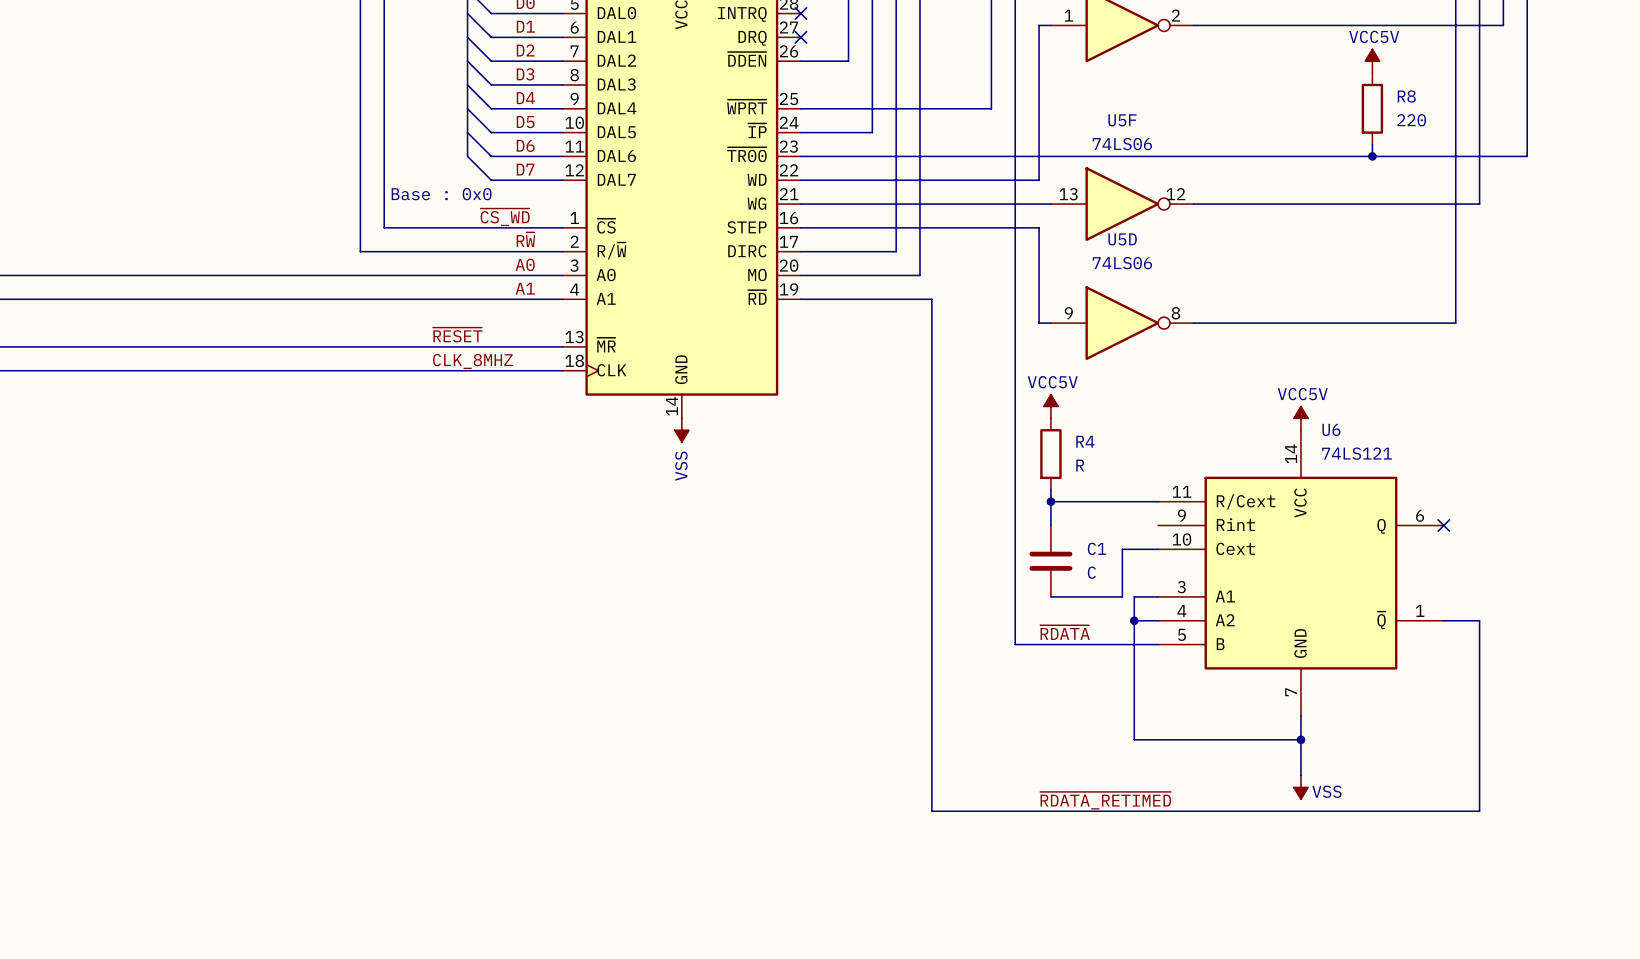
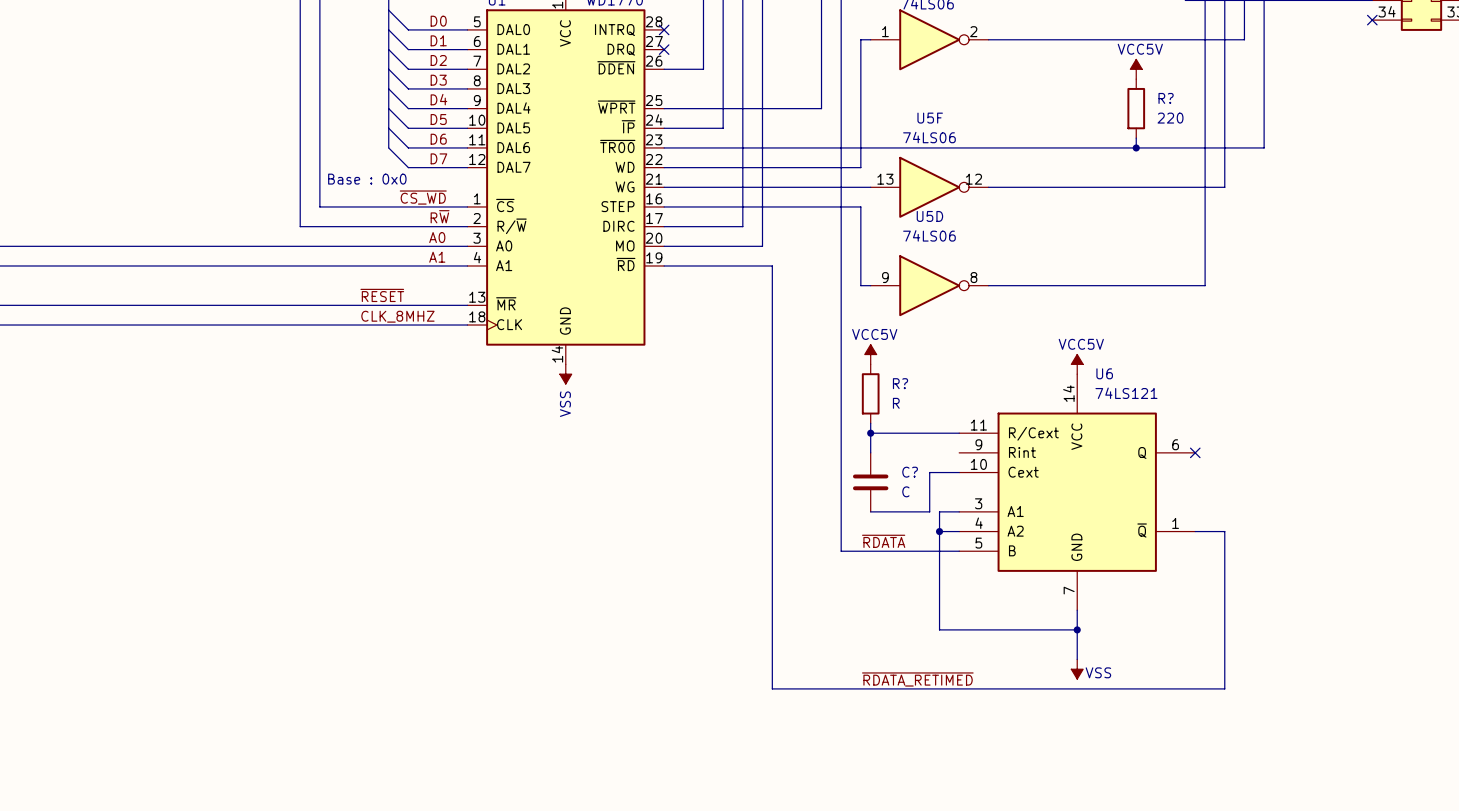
R8 name: R8 (1406, 96) -> R? (1166, 98)
R4 name: R4 (1085, 441) -> R? (900, 383)
C1 name: C1 (1097, 548) -> C? (910, 472)

